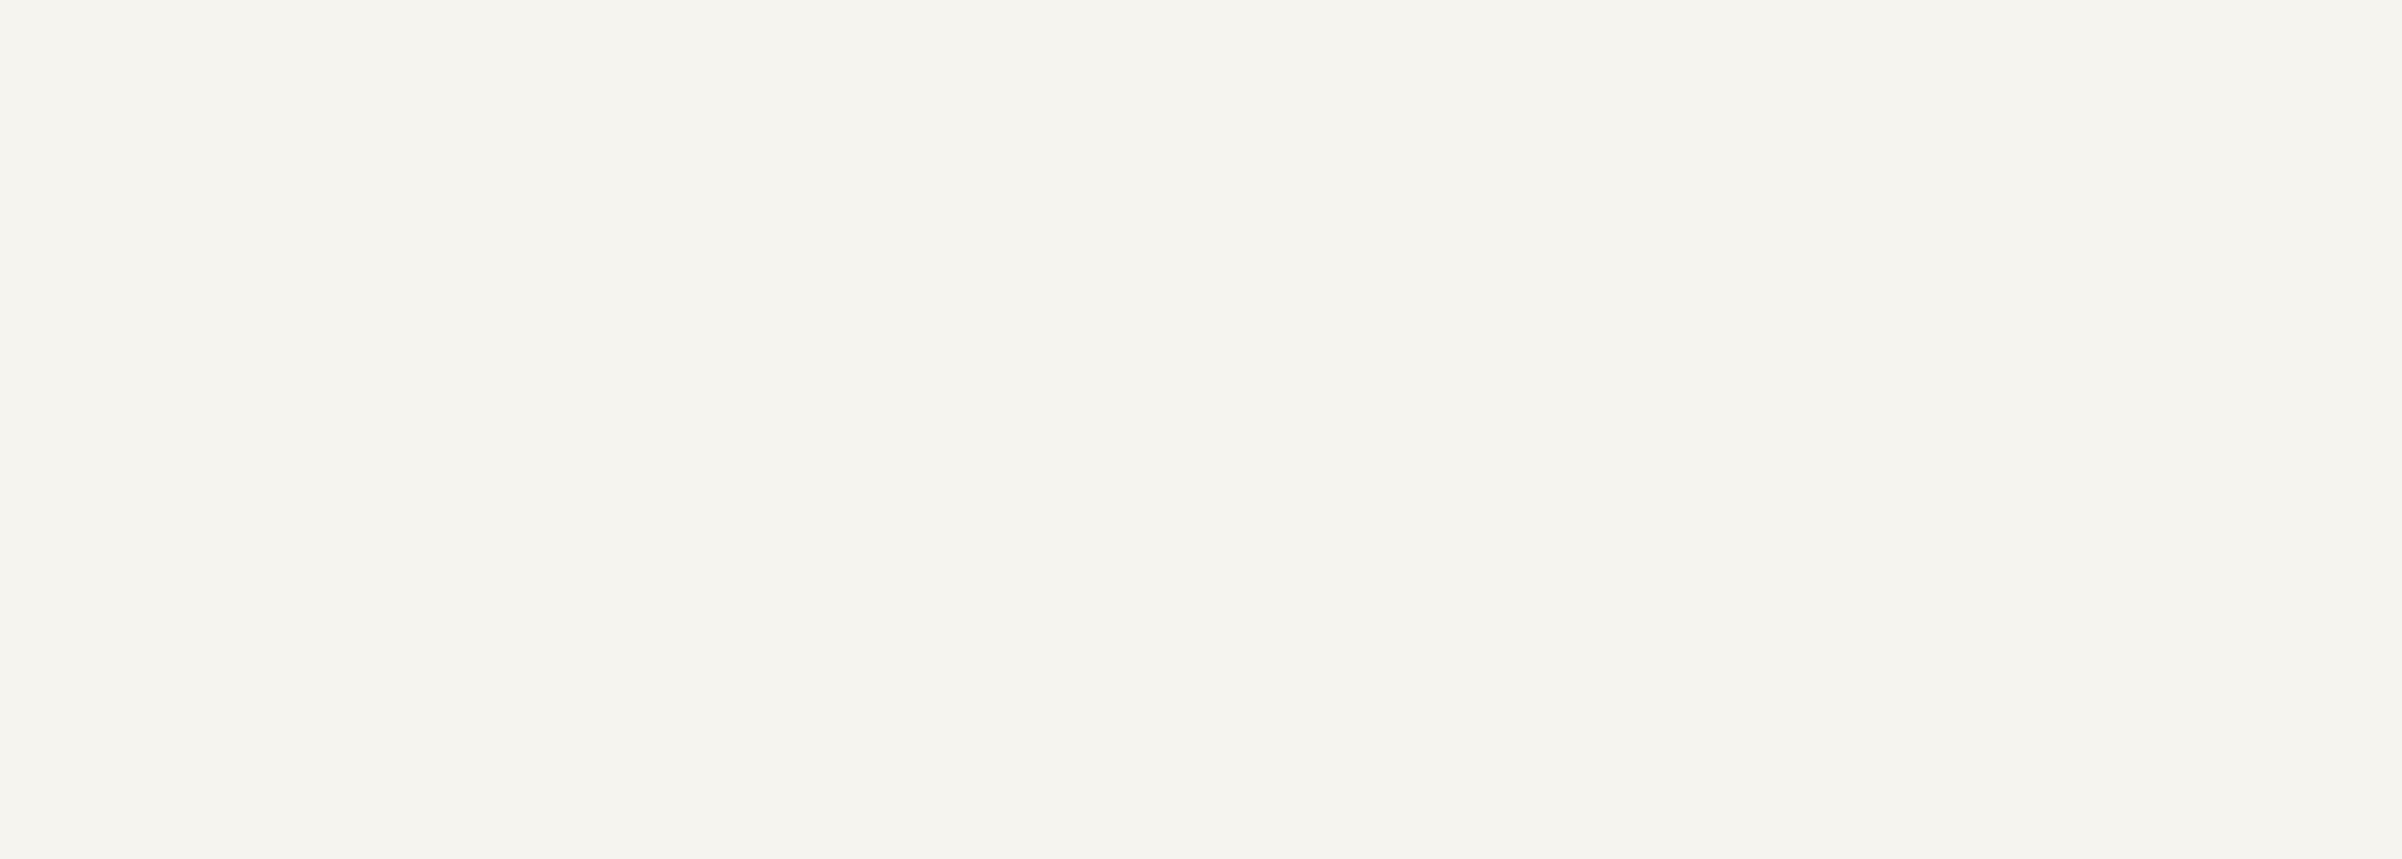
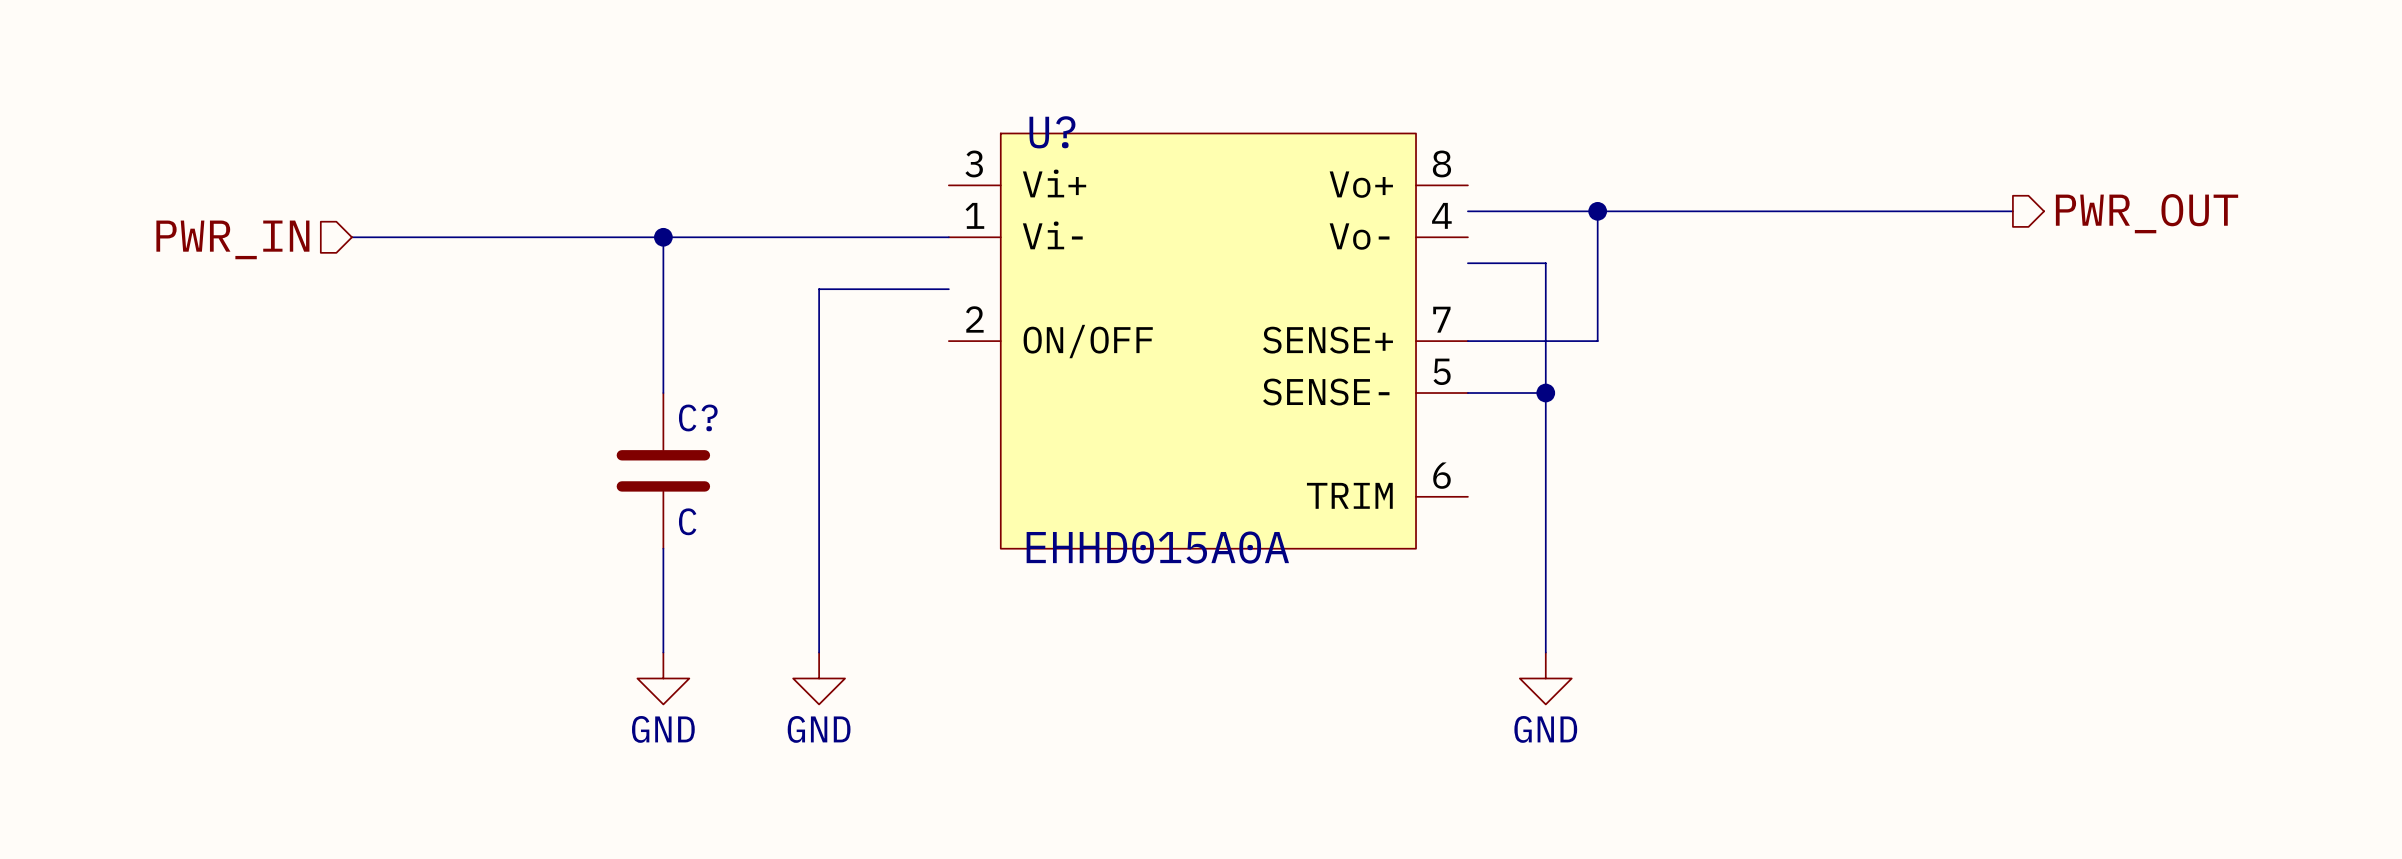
wire: none -> (1467, 211) (2012, 211)
wire: none -> (1597, 211) (1597, 341) (1467, 341)
junction: none -> (1597, 211)
hierarchical label: none -> PWR_OUT (2147, 213)
hierarchical label: none -> PWR_IN (232, 239)
wire: none -> (351, 237) (948, 237)
wire: none -> (663, 237) (663, 393)
junction: none -> (663, 237)
wire: none -> (1467, 263) (1545, 263) (1545, 652)
wire: none -> (948, 289) (819, 289) (819, 652)
U?: none -> EHHD015A0A (1208, 341)
wire: none -> (1467, 393) (1545, 393)
junction: none -> (1545, 393)
C?: none -> C (663, 470)
wire: none -> (663, 548) (663, 652)
power symbol: none -> GND (663, 678)
power symbol: none -> GND (819, 678)
power symbol: none -> GND (1545, 678)

